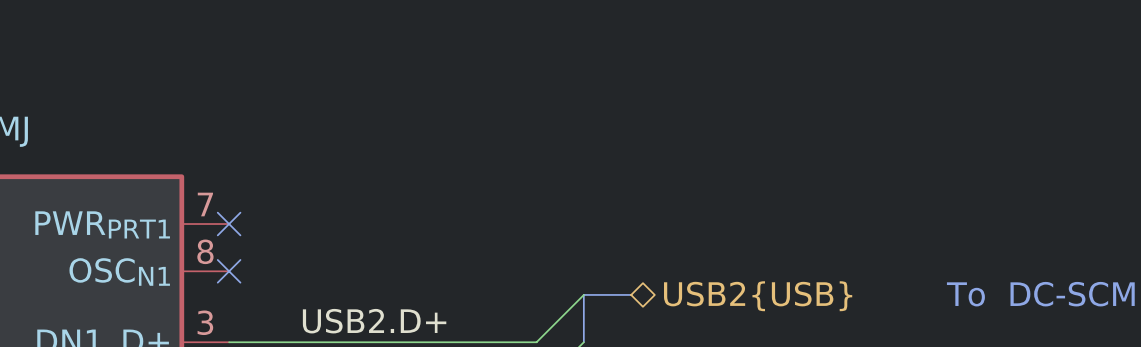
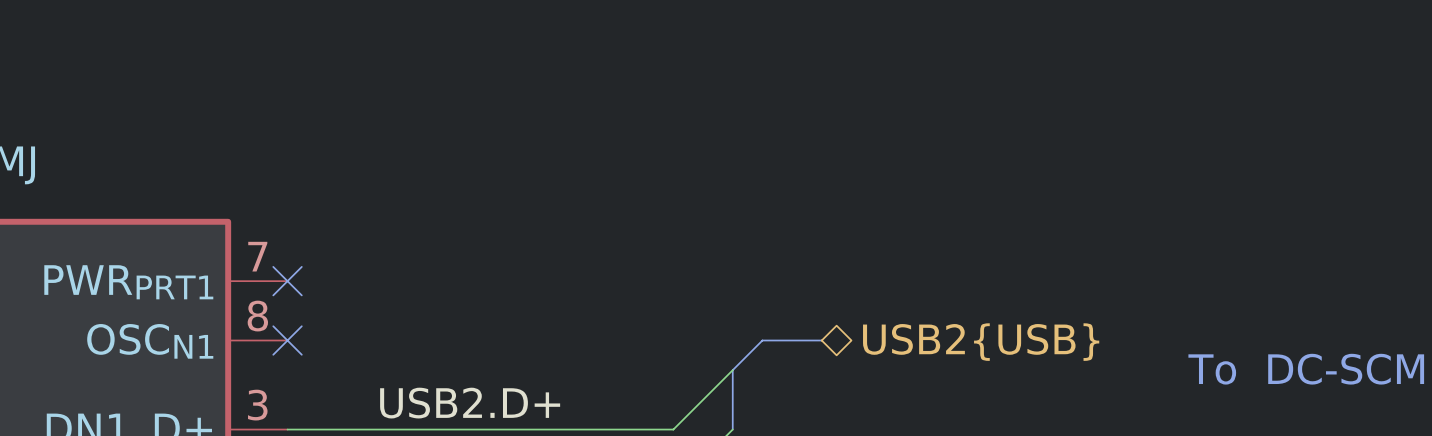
bus: (583, 294) (631, 294) -> (732, 370) (762, 340) (821, 340)
hierarchical label position: USB2{USB} (758, 296) -> USB2{USB} (981, 342)

